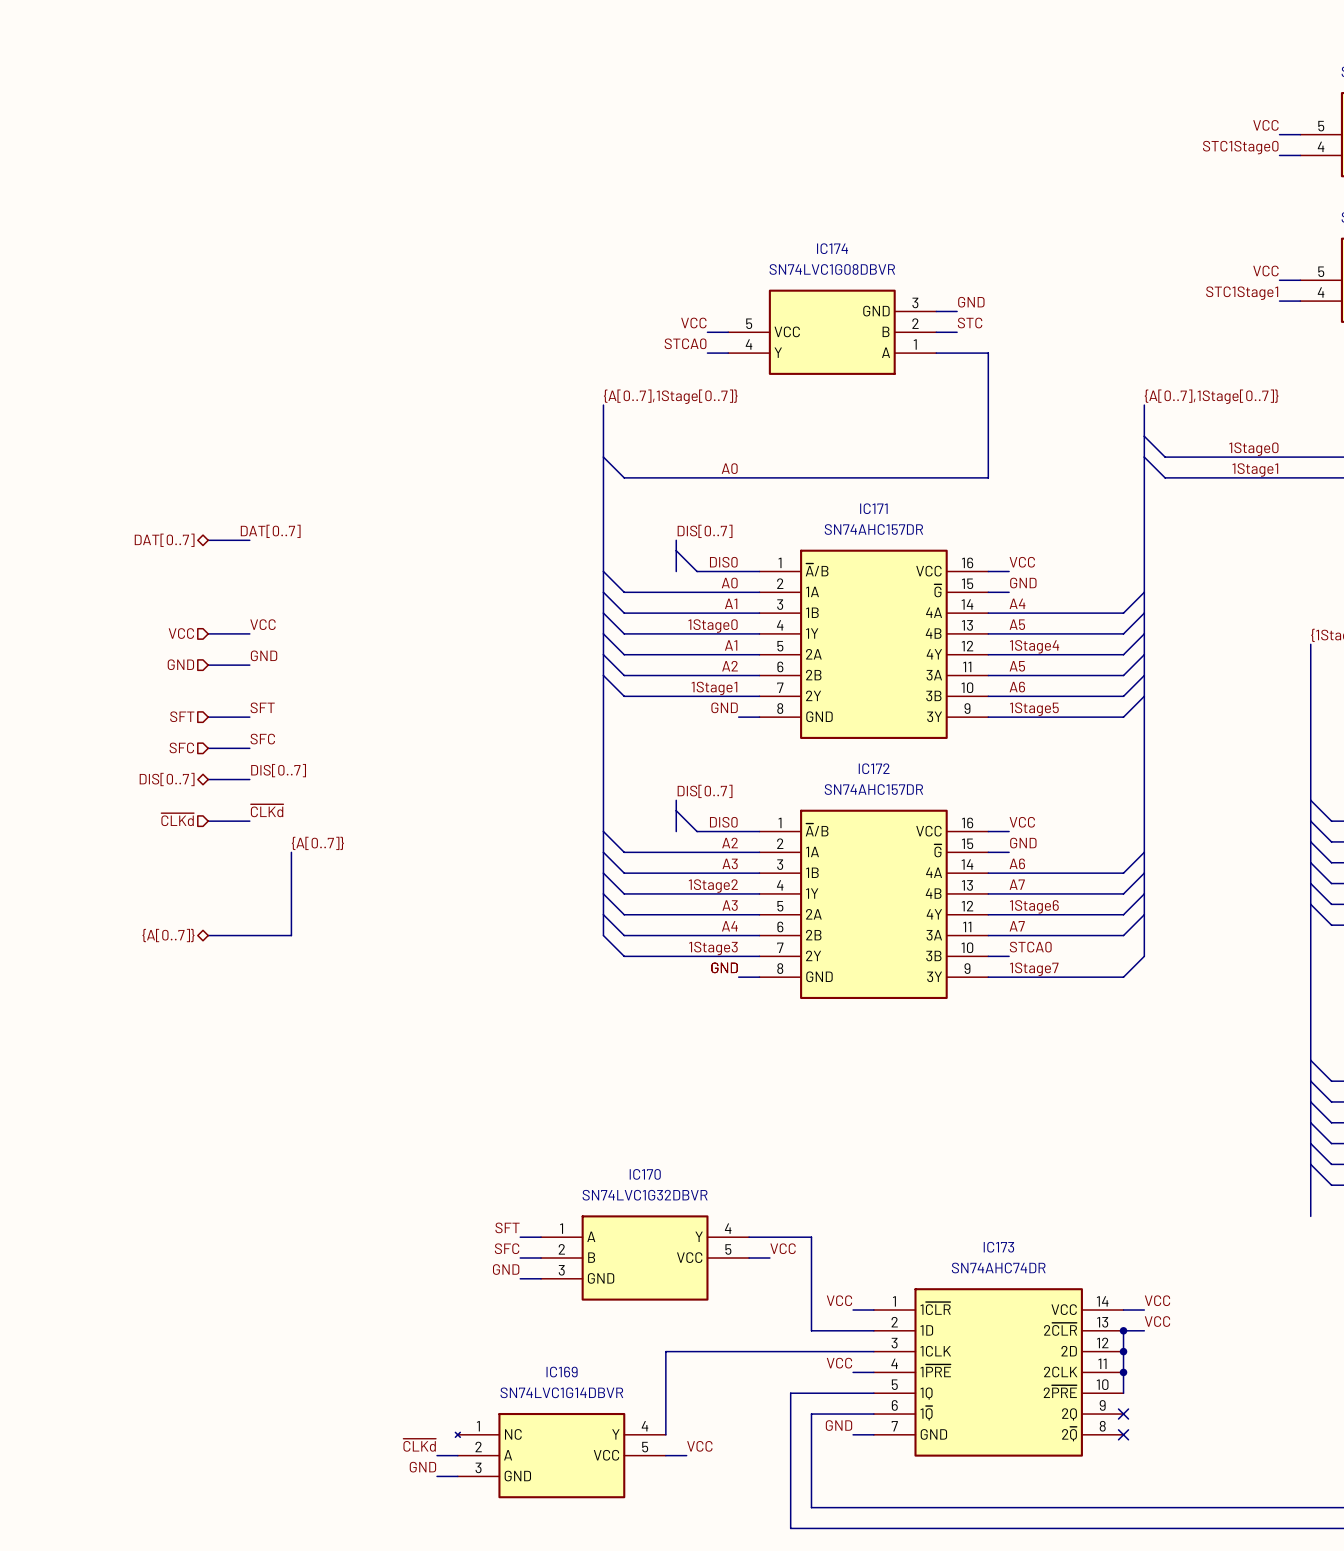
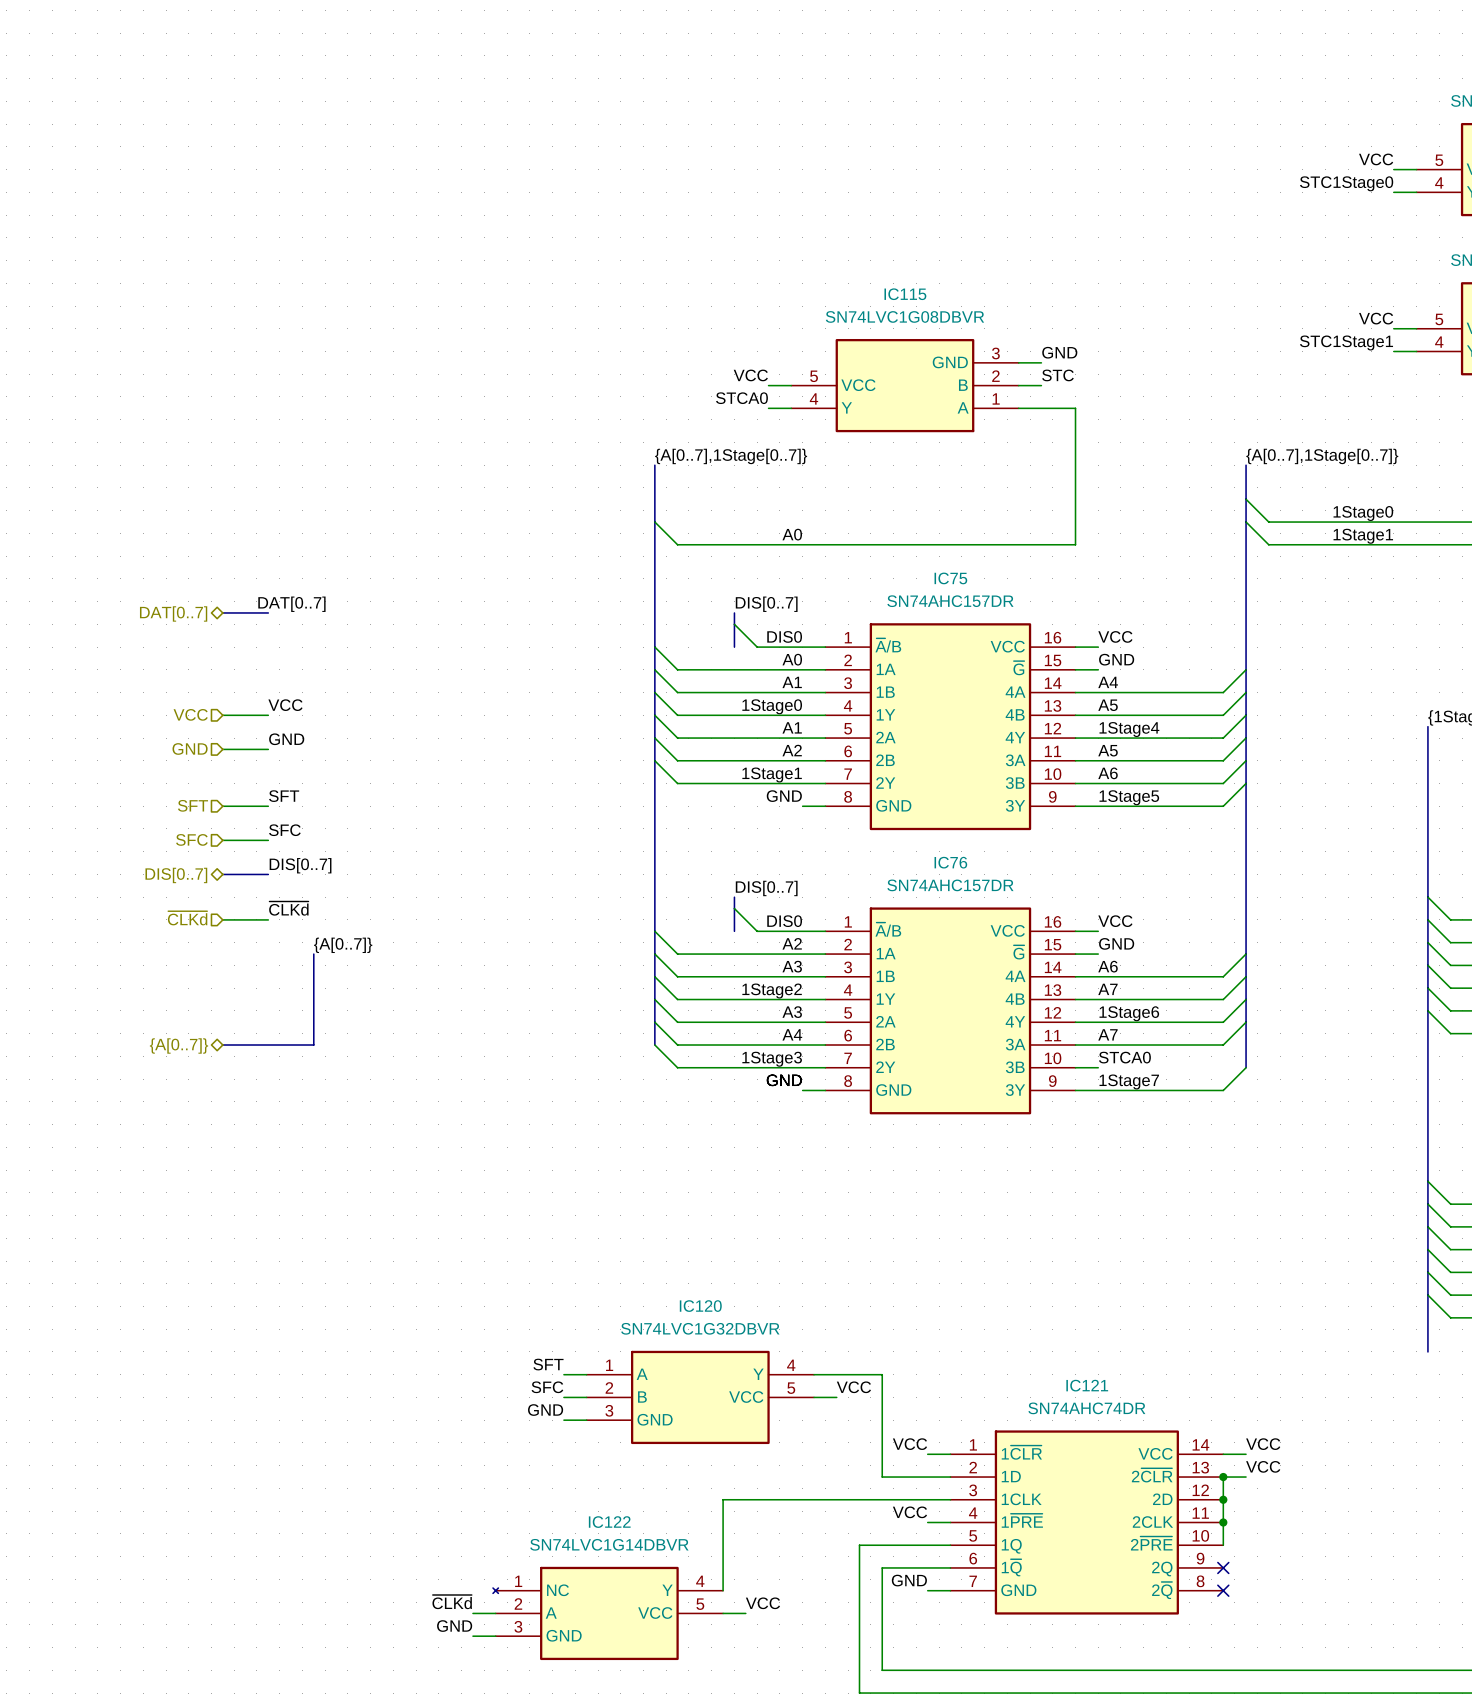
IC174 name: IC174 (832, 248) -> IC115 (905, 294)
IC171 name: IC171 (873, 508) -> IC75 (950, 578)
IC172 name: IC172 (874, 768) -> IC76 (950, 862)
IC170 name: IC170 (645, 1174) -> IC120 (700, 1306)
IC173 name: IC173 (998, 1247) -> IC121 (1087, 1385)
IC169 name: IC169 (562, 1372) -> IC122 (609, 1522)

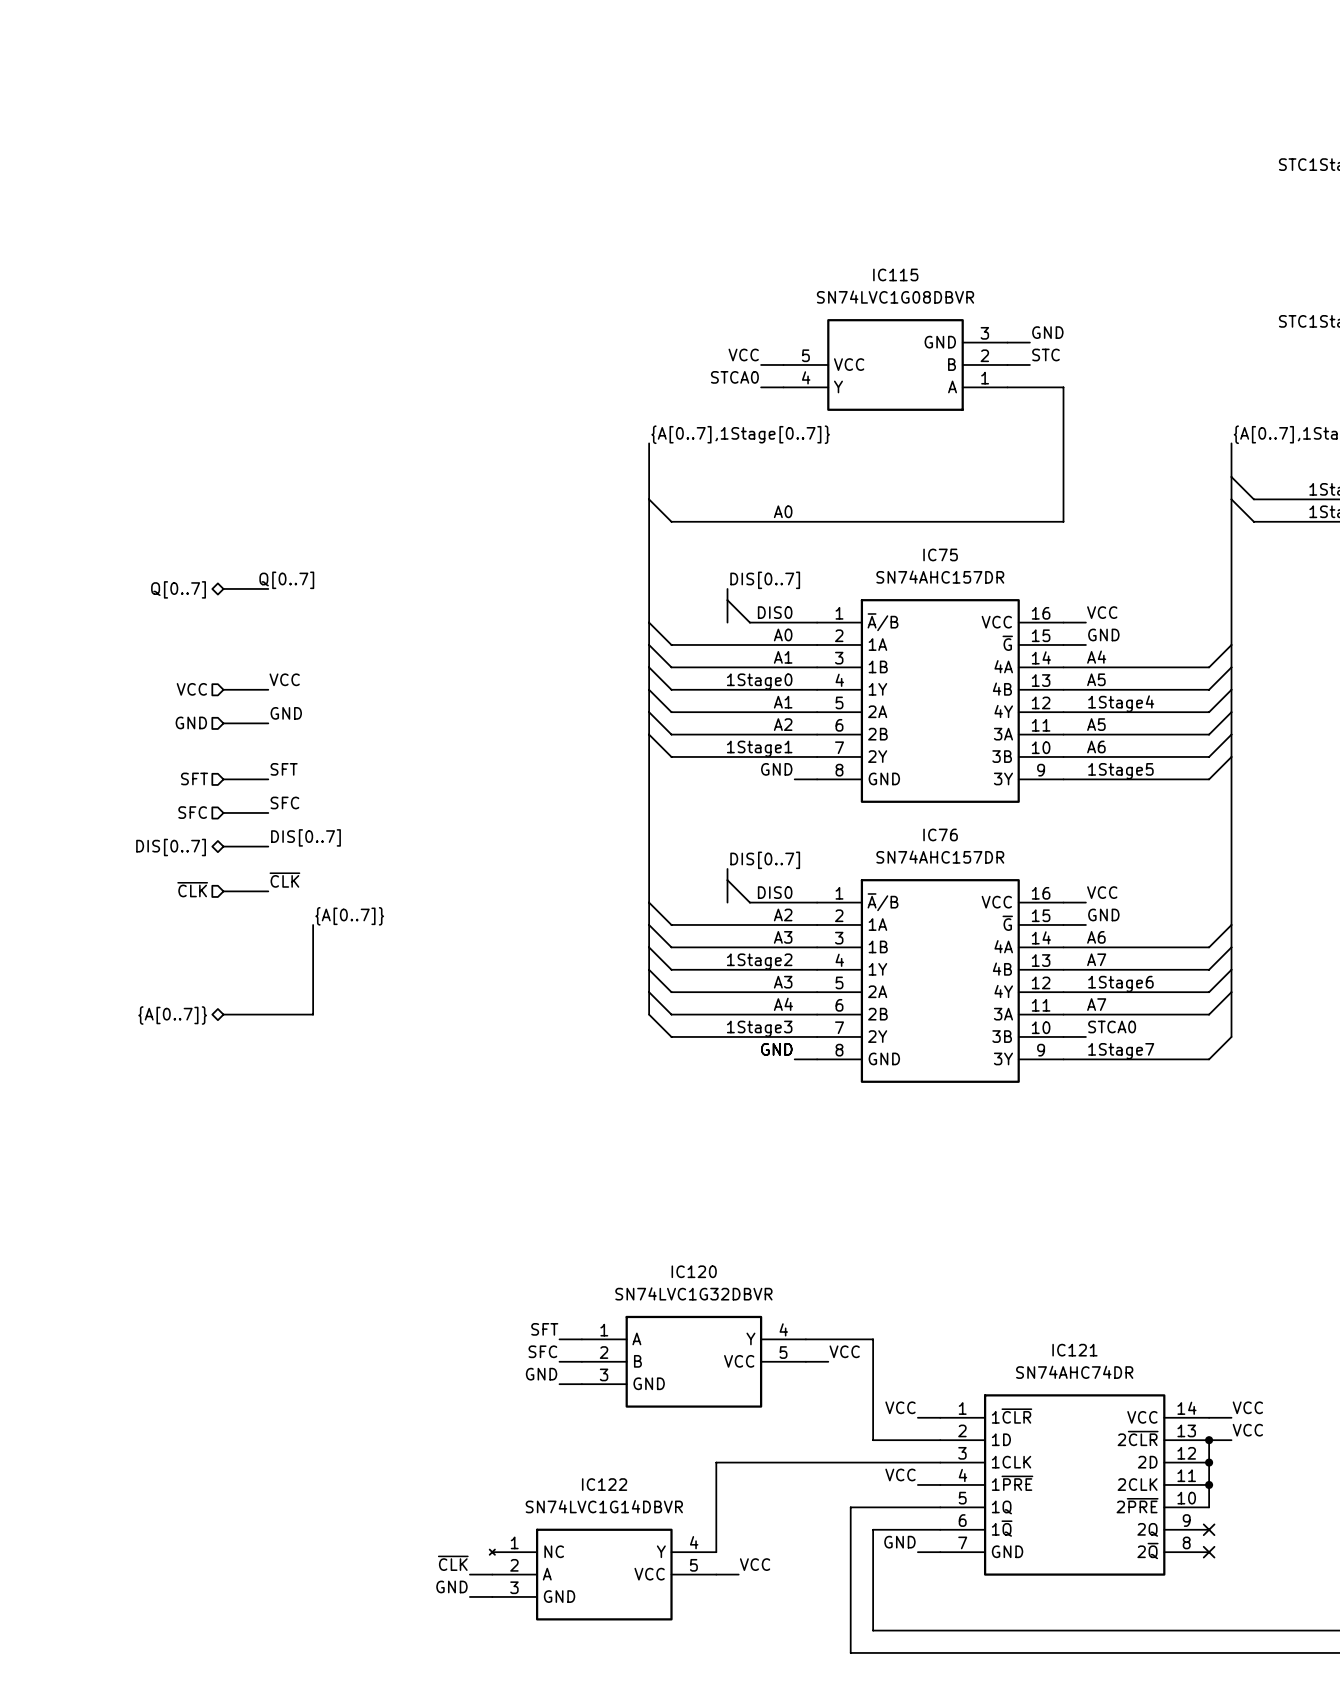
label: DAT[0..7] (291, 604) -> Q[0..7] (286, 580)
hierarchical label: DAT[0..7] (173, 613) -> Q[0..7] (178, 589)
label: ~{CLKd} (288, 908) -> ~{CLK} (284, 880)
hierarchical label: ~{CLKd} (187, 918) -> ~{CLK} (192, 889)
label: ~{CLKd} (452, 1602) -> ~{CLK} (453, 1563)

